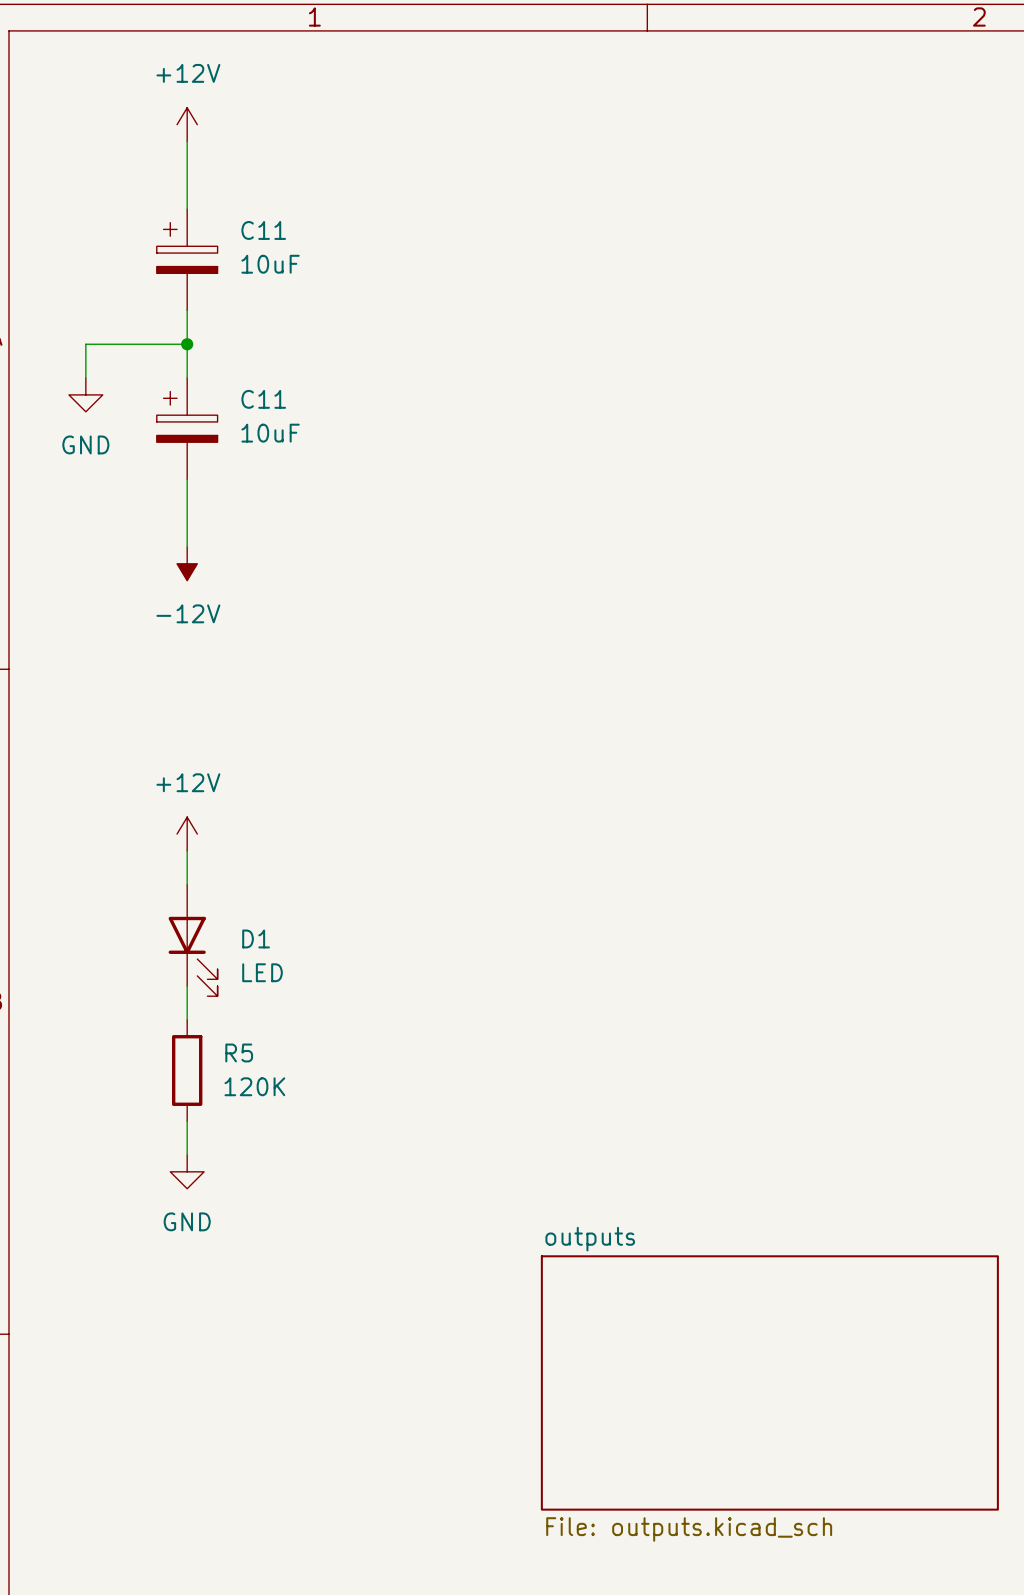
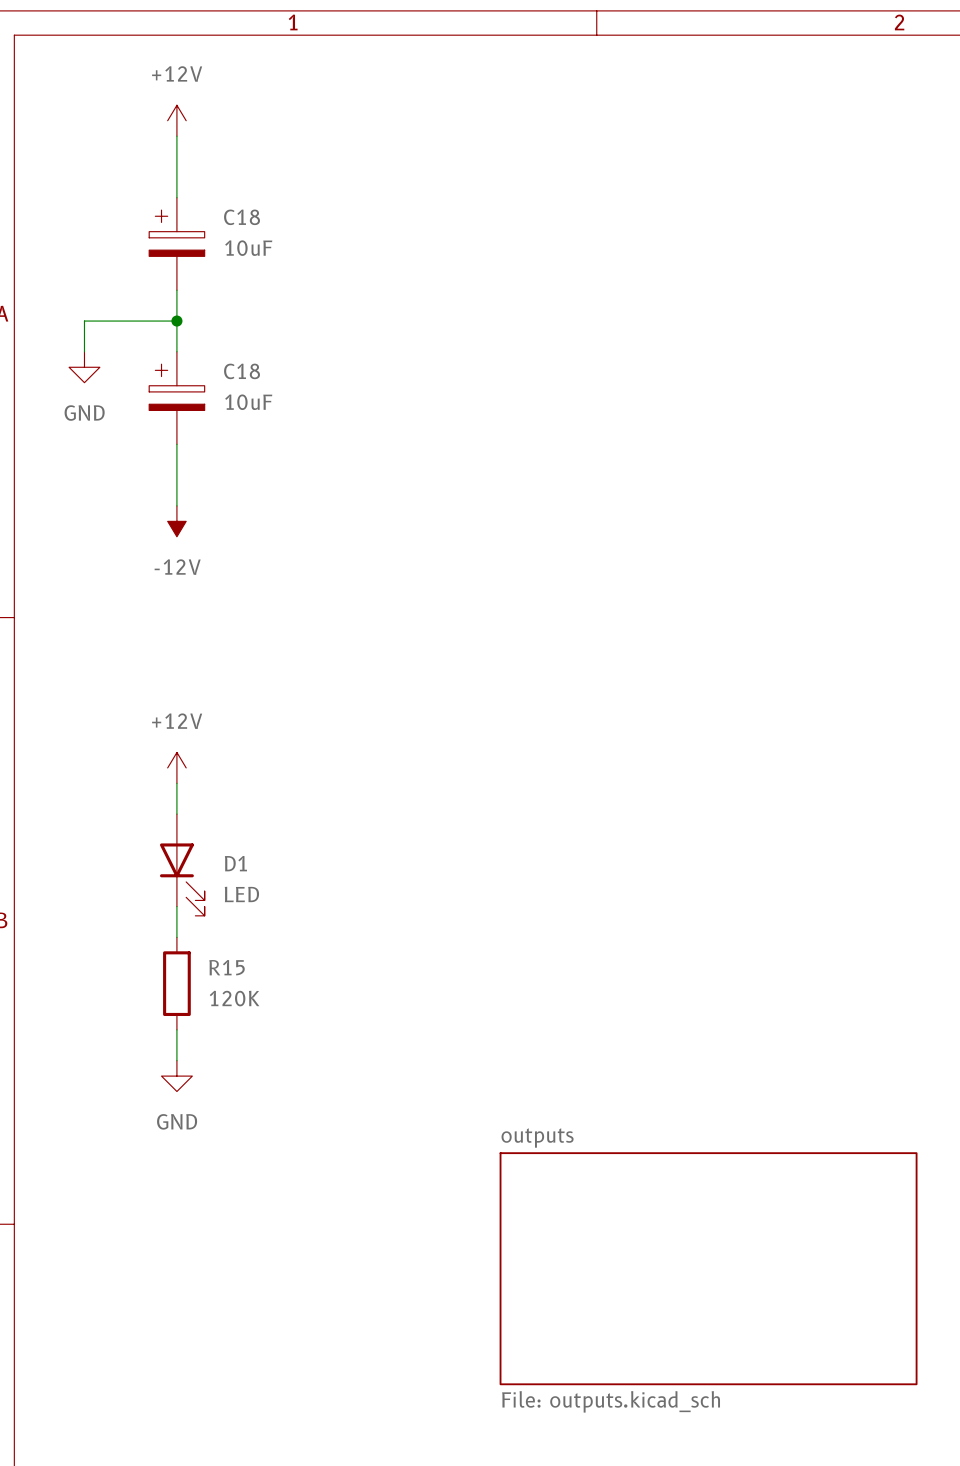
C11 name: C11 (263, 230) -> C18 (242, 217)
C11 name: C11 (263, 399) -> C18 (242, 371)
R5 name: R5 (239, 1052) -> R15 (227, 967)

